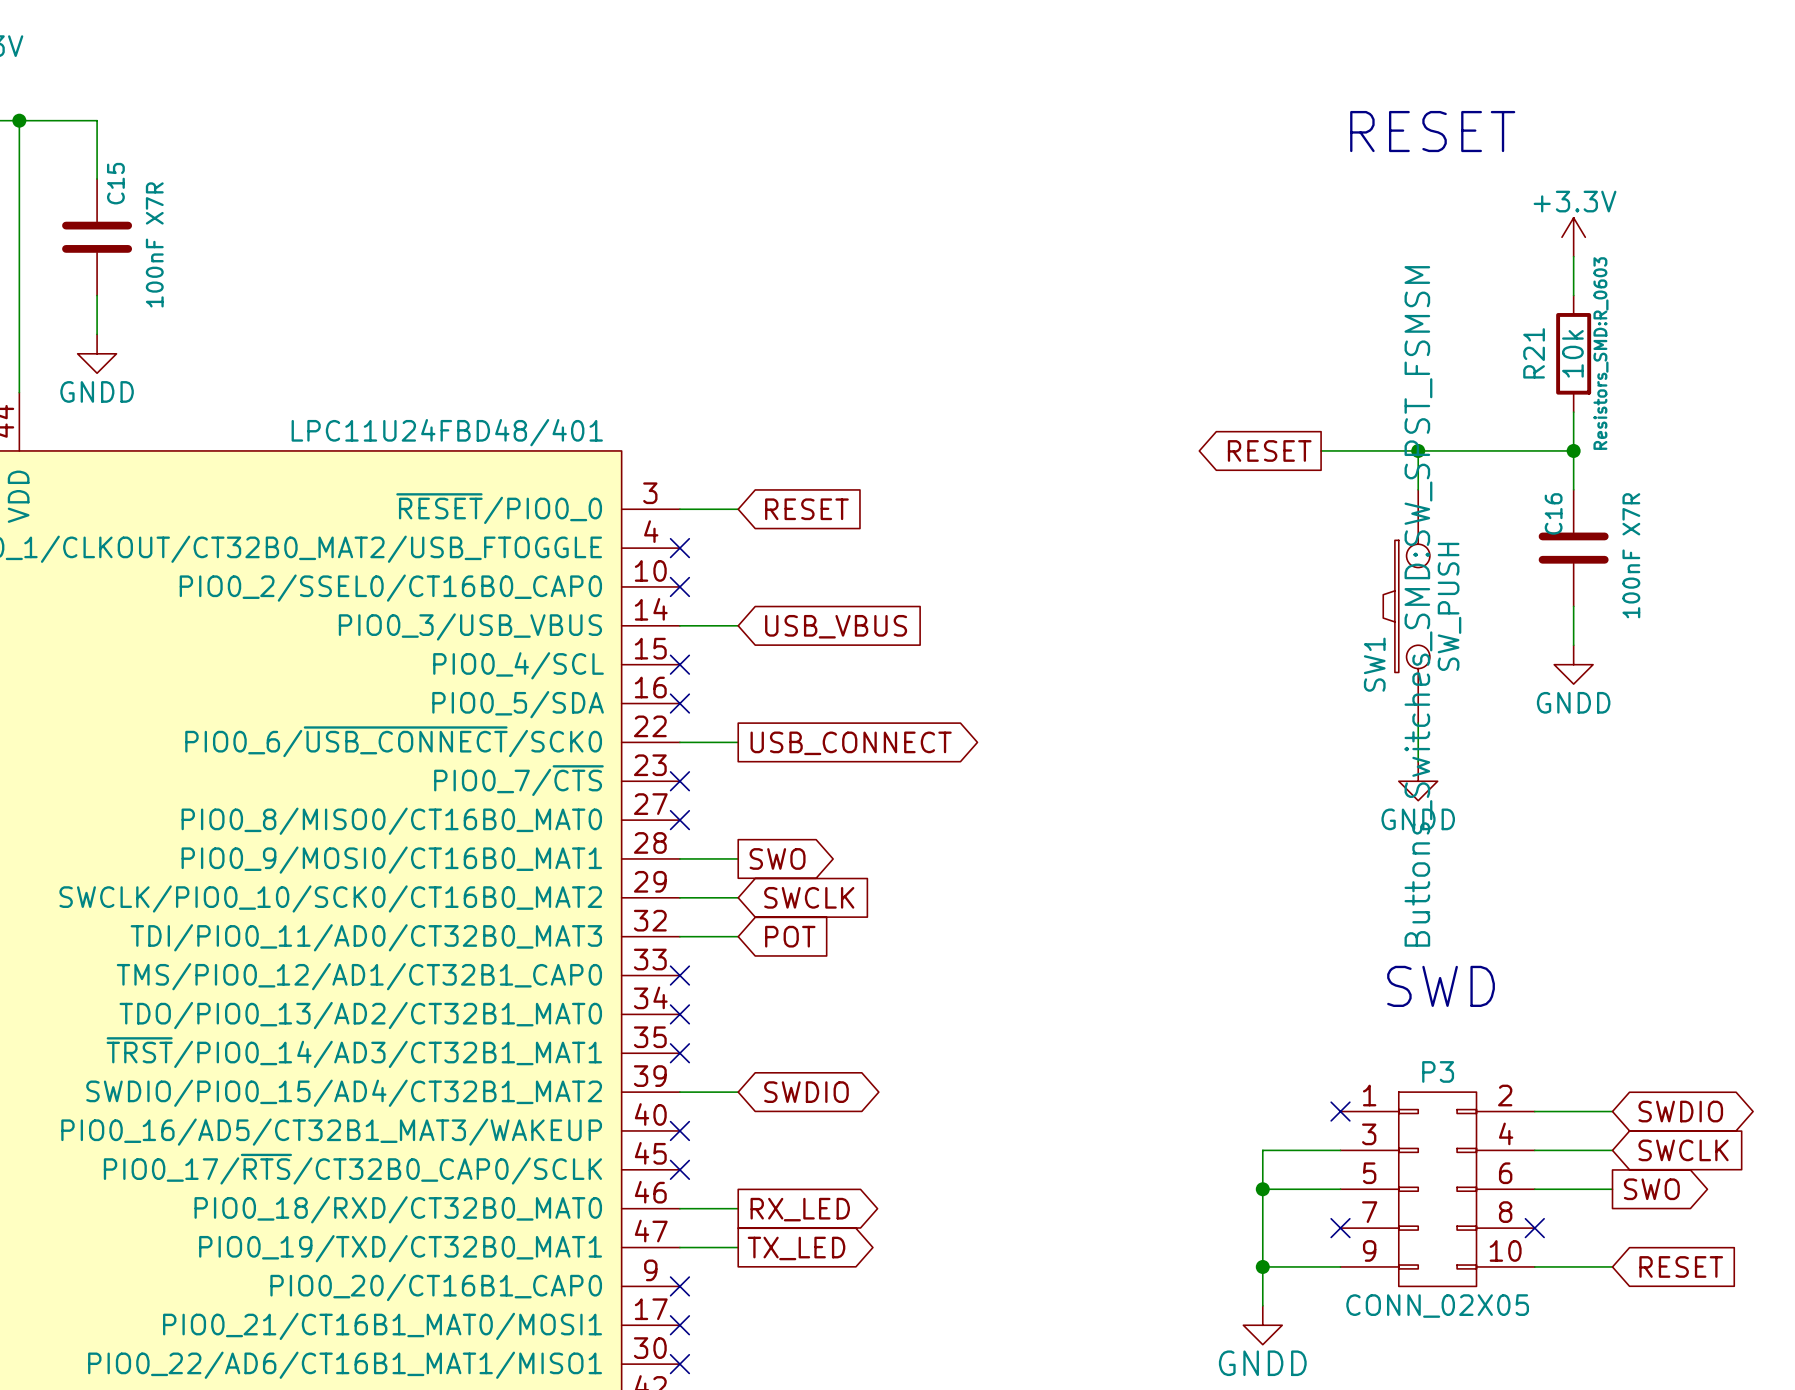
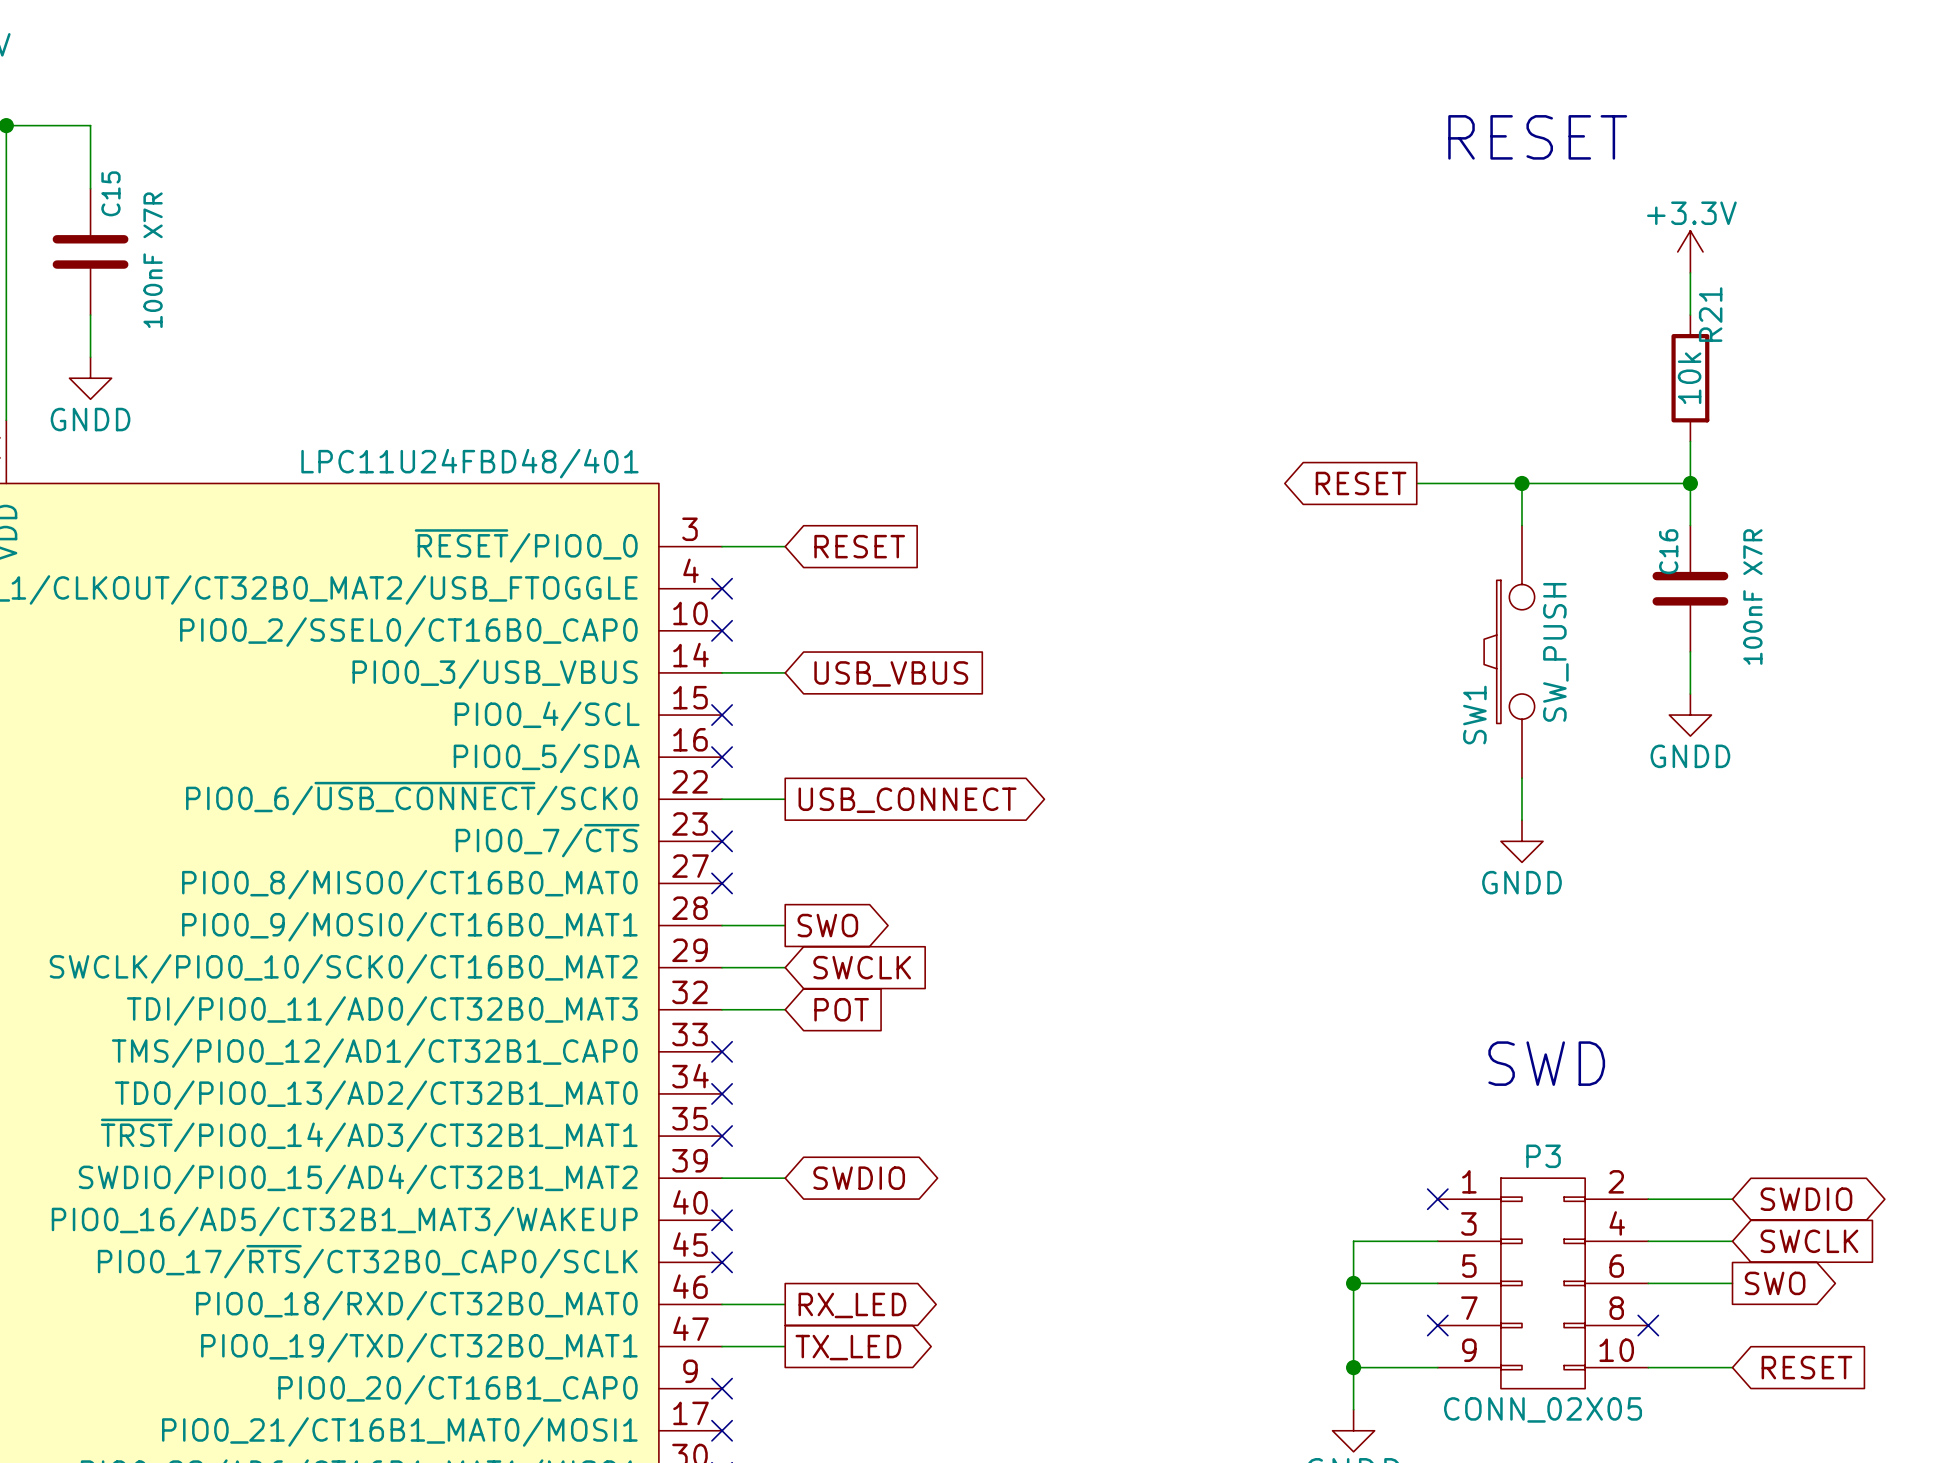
R21 name position: R21 (1534, 353) -> R21 (1710, 314)
R21 text: Resistors_SMD:R_0603 (1600, 353) -> none
SW1 text: Buttons_Switches_SMD:SW_SPST_FSMSM (1418, 606) -> none

